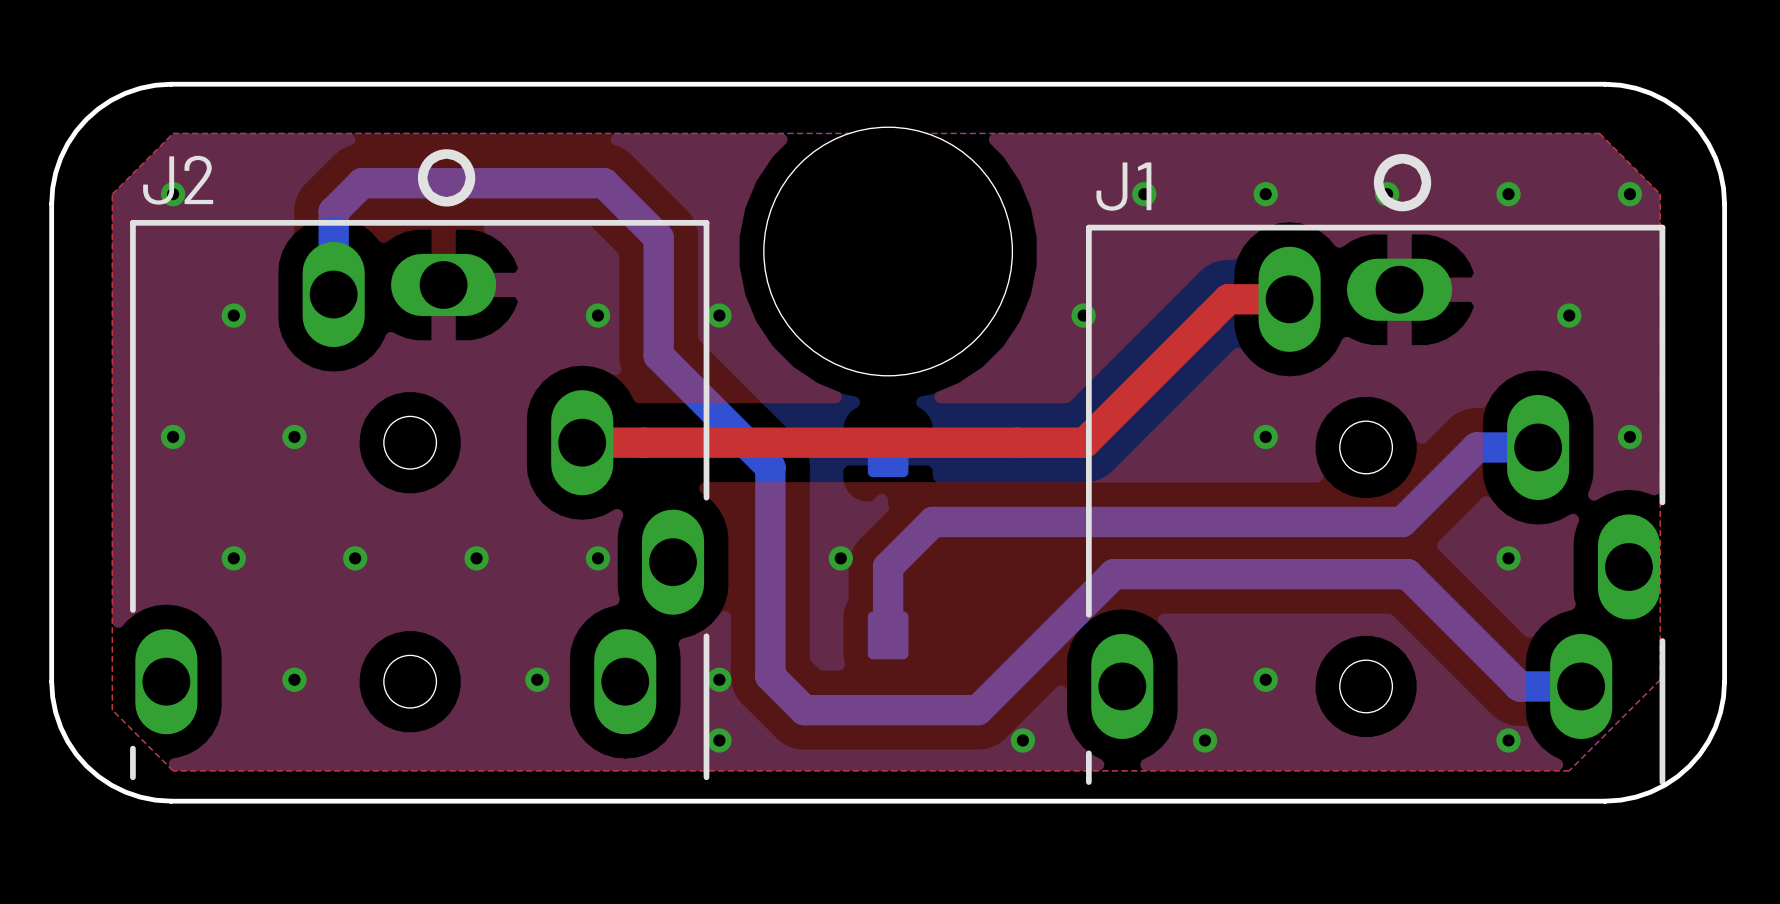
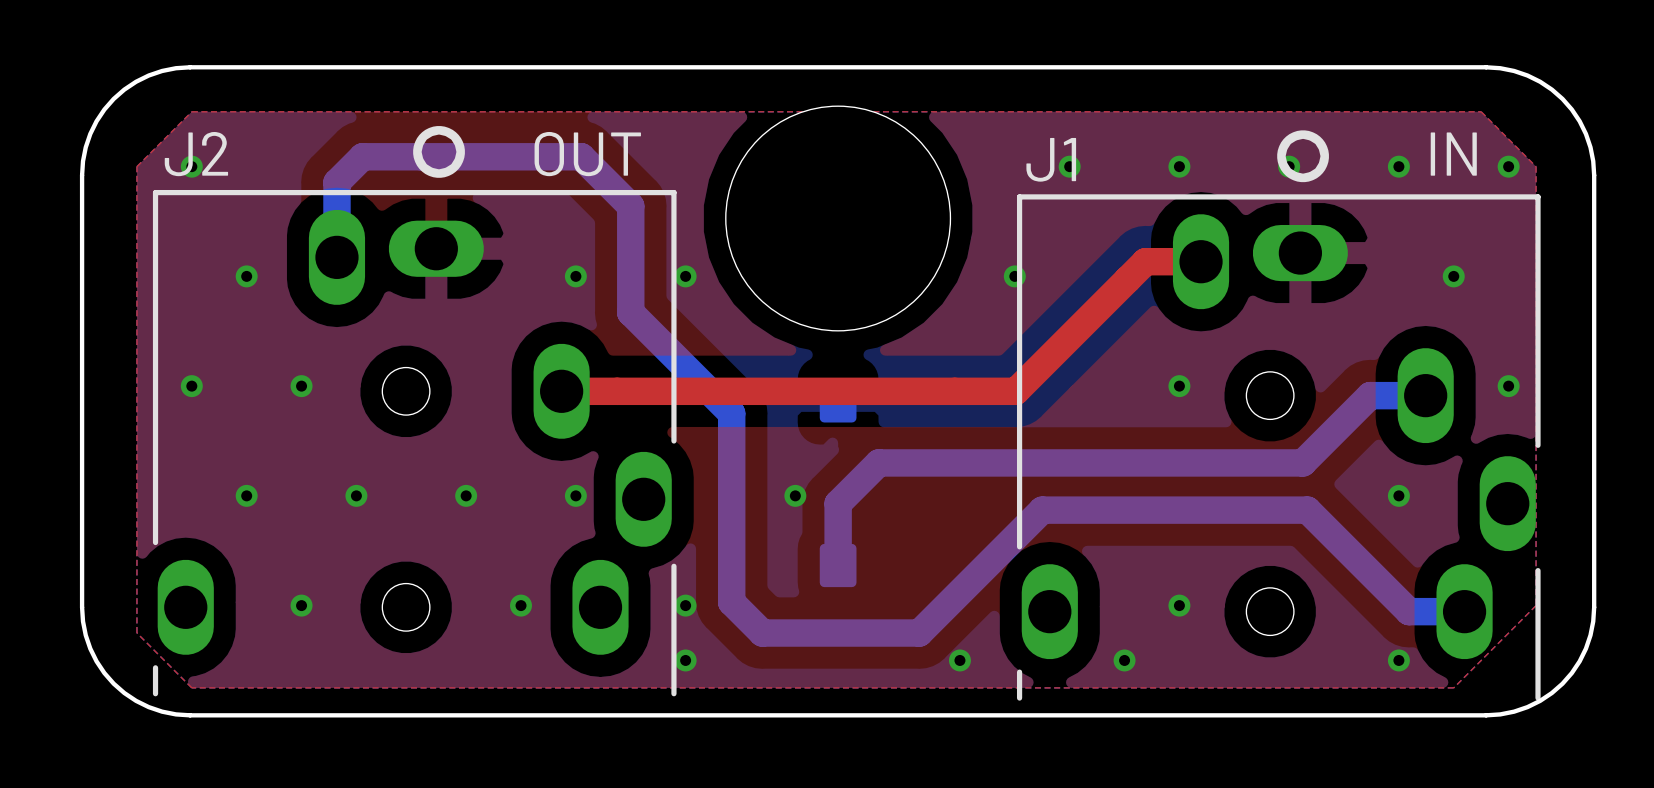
text: none -> OUT (587, 154)
text: none -> IN (1453, 154)

